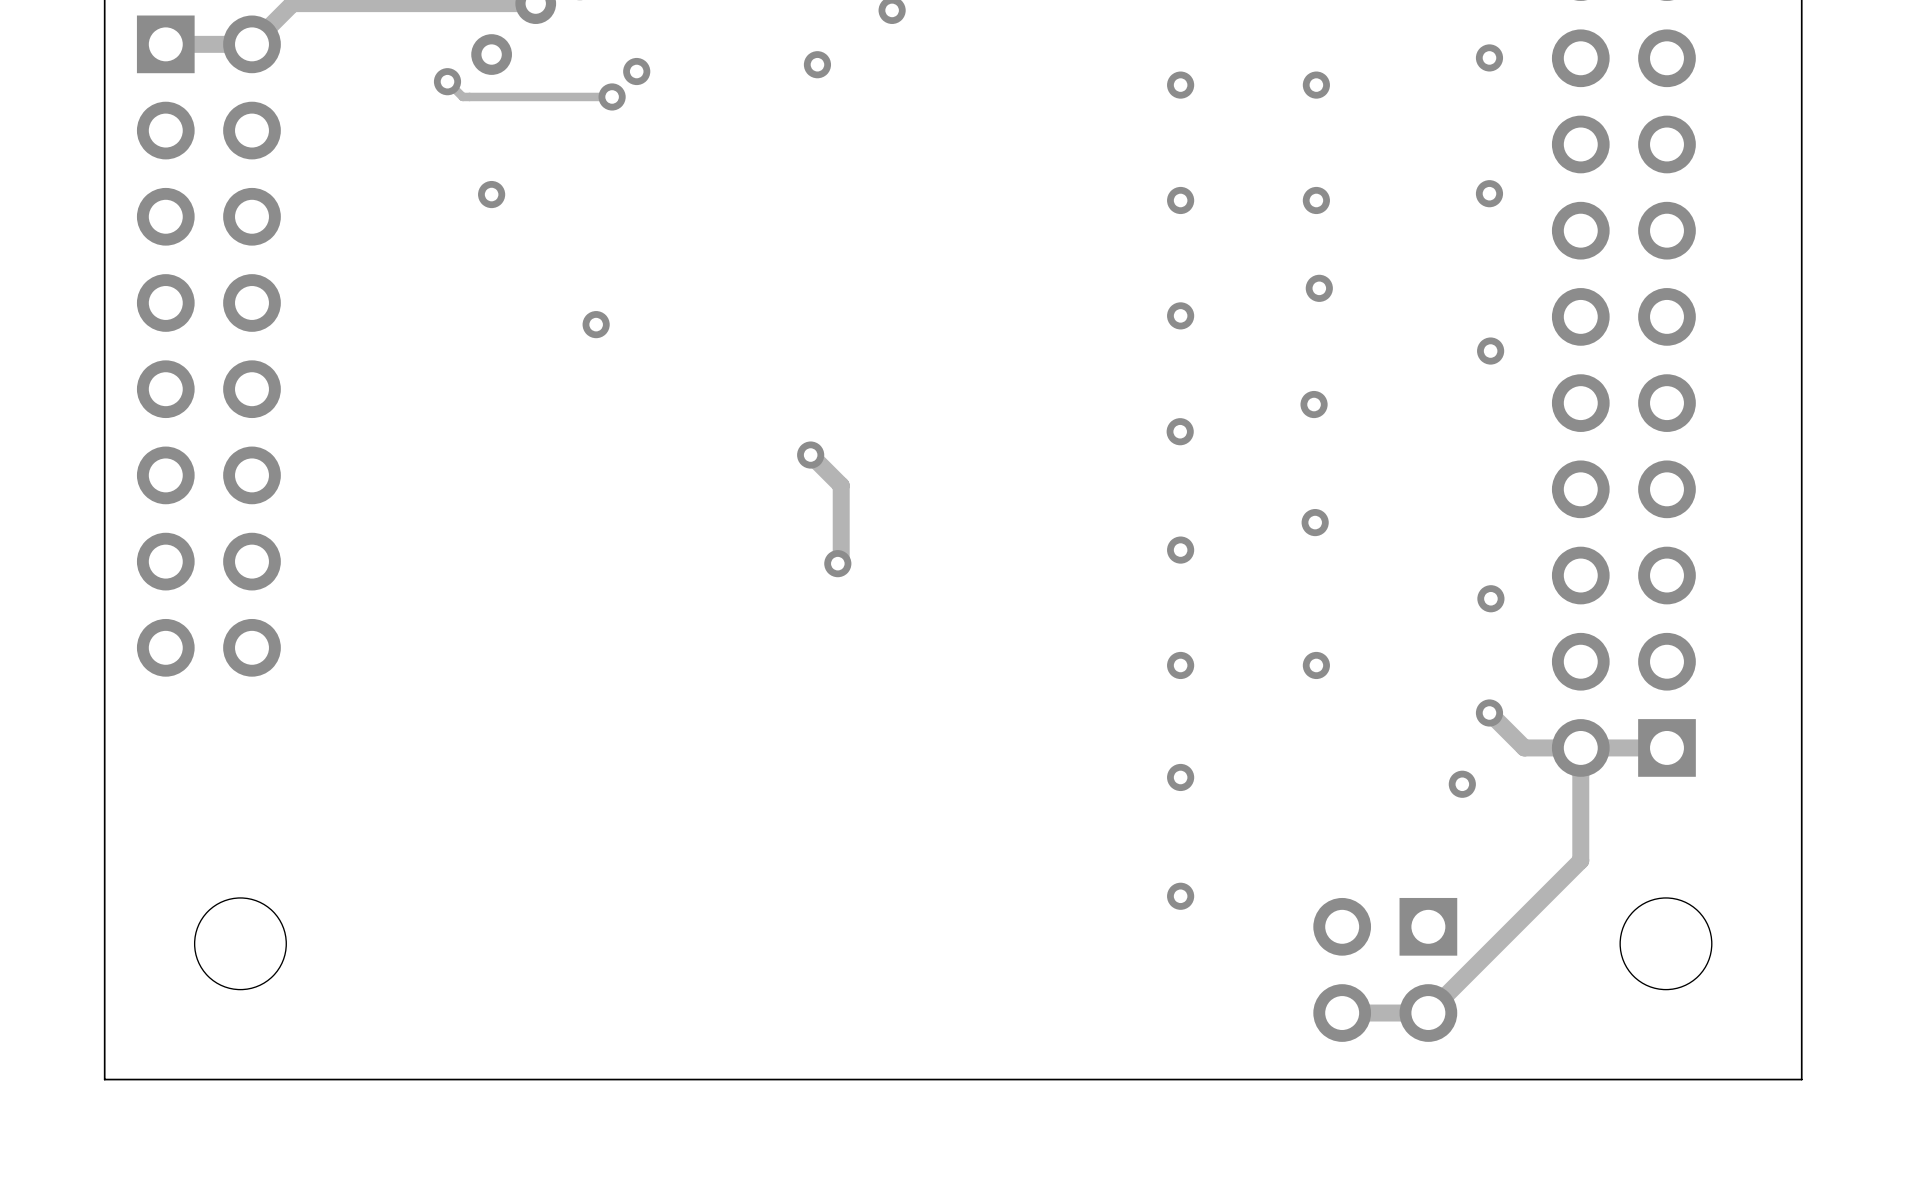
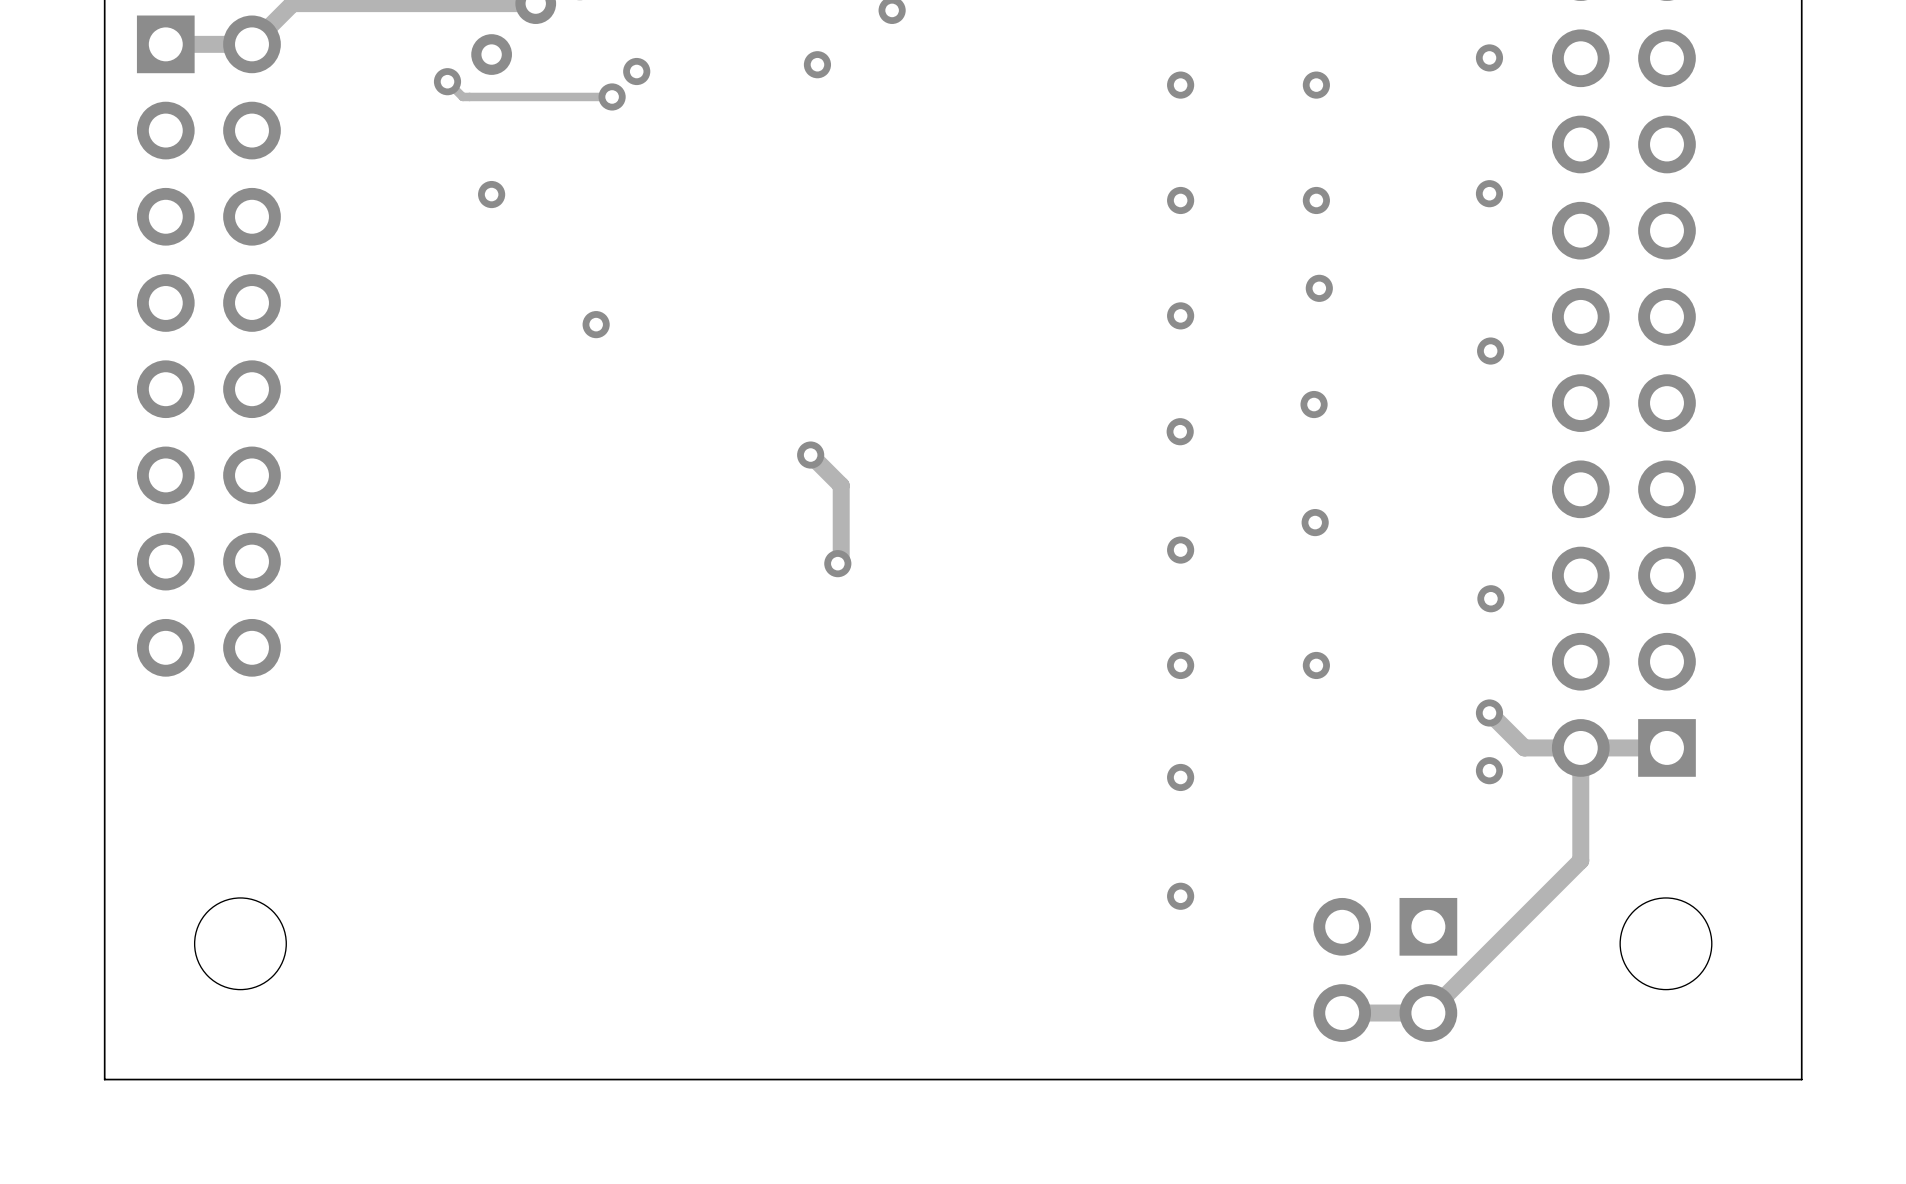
via position: (1462, 784) -> (1489, 770)

